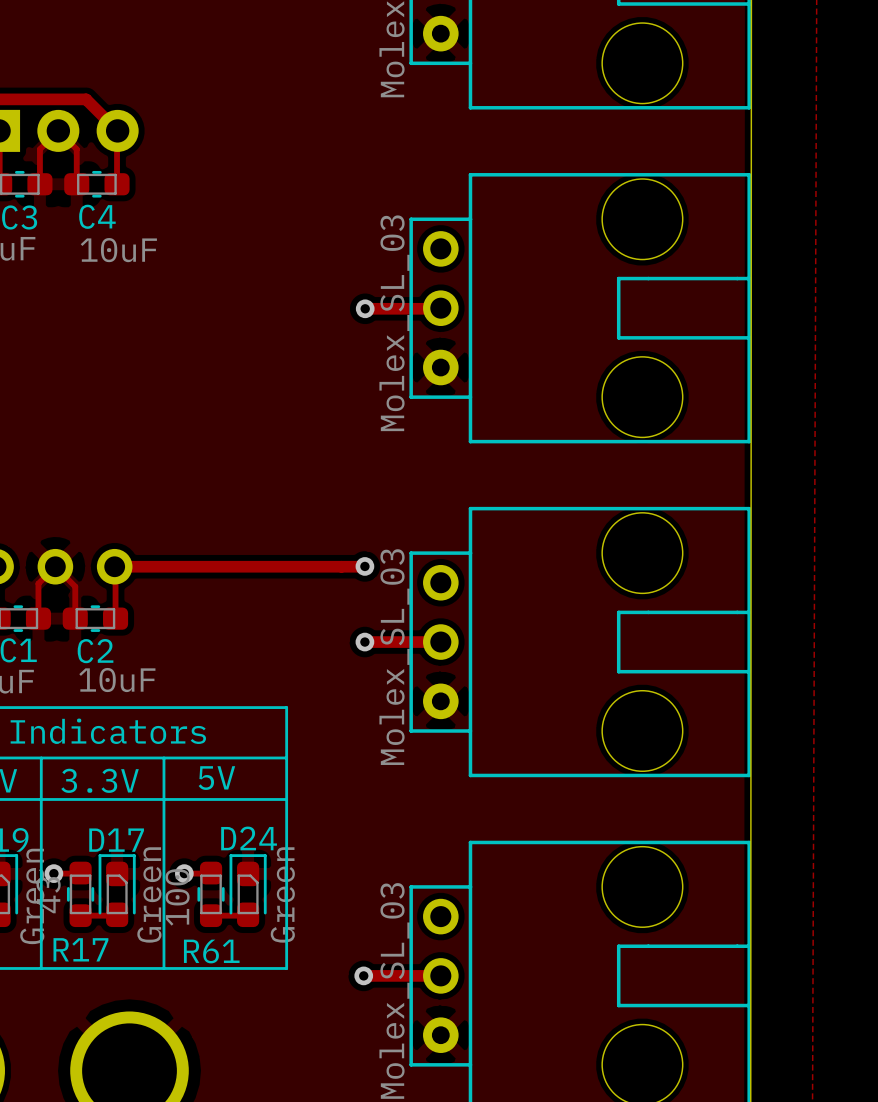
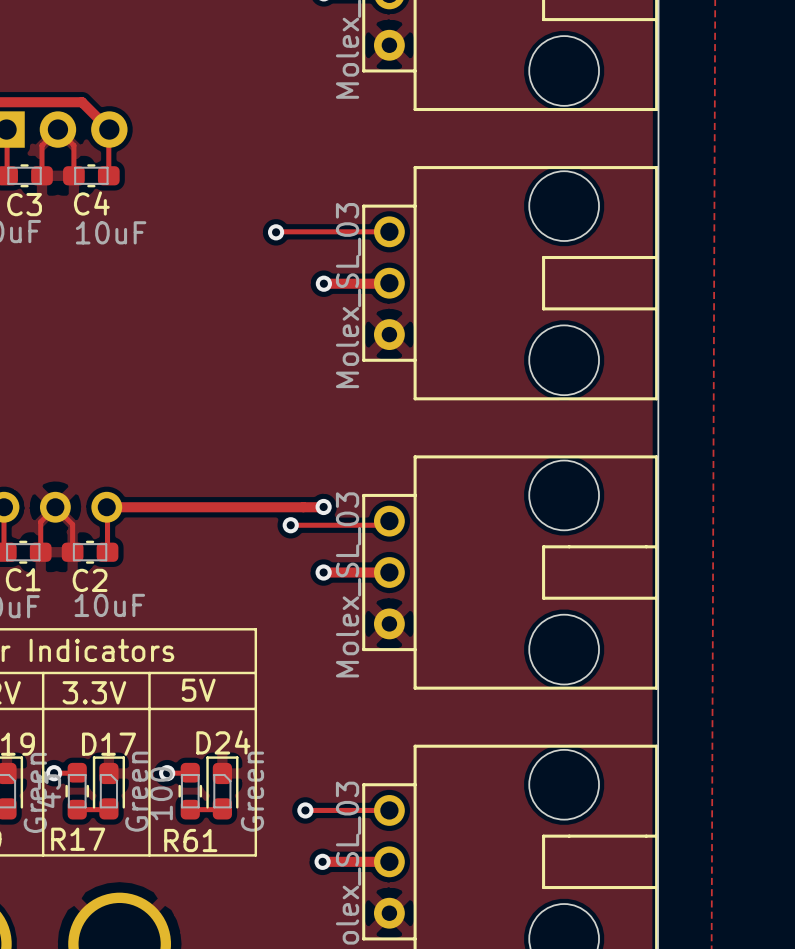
track: none -> (389, 231) (276, 232)
via: none -> (276, 232)
track: none -> (290, 525) (385, 525)
via: none -> (290, 525)
track: none -> (305, 810) (389, 810)
via: none -> (305, 810)

